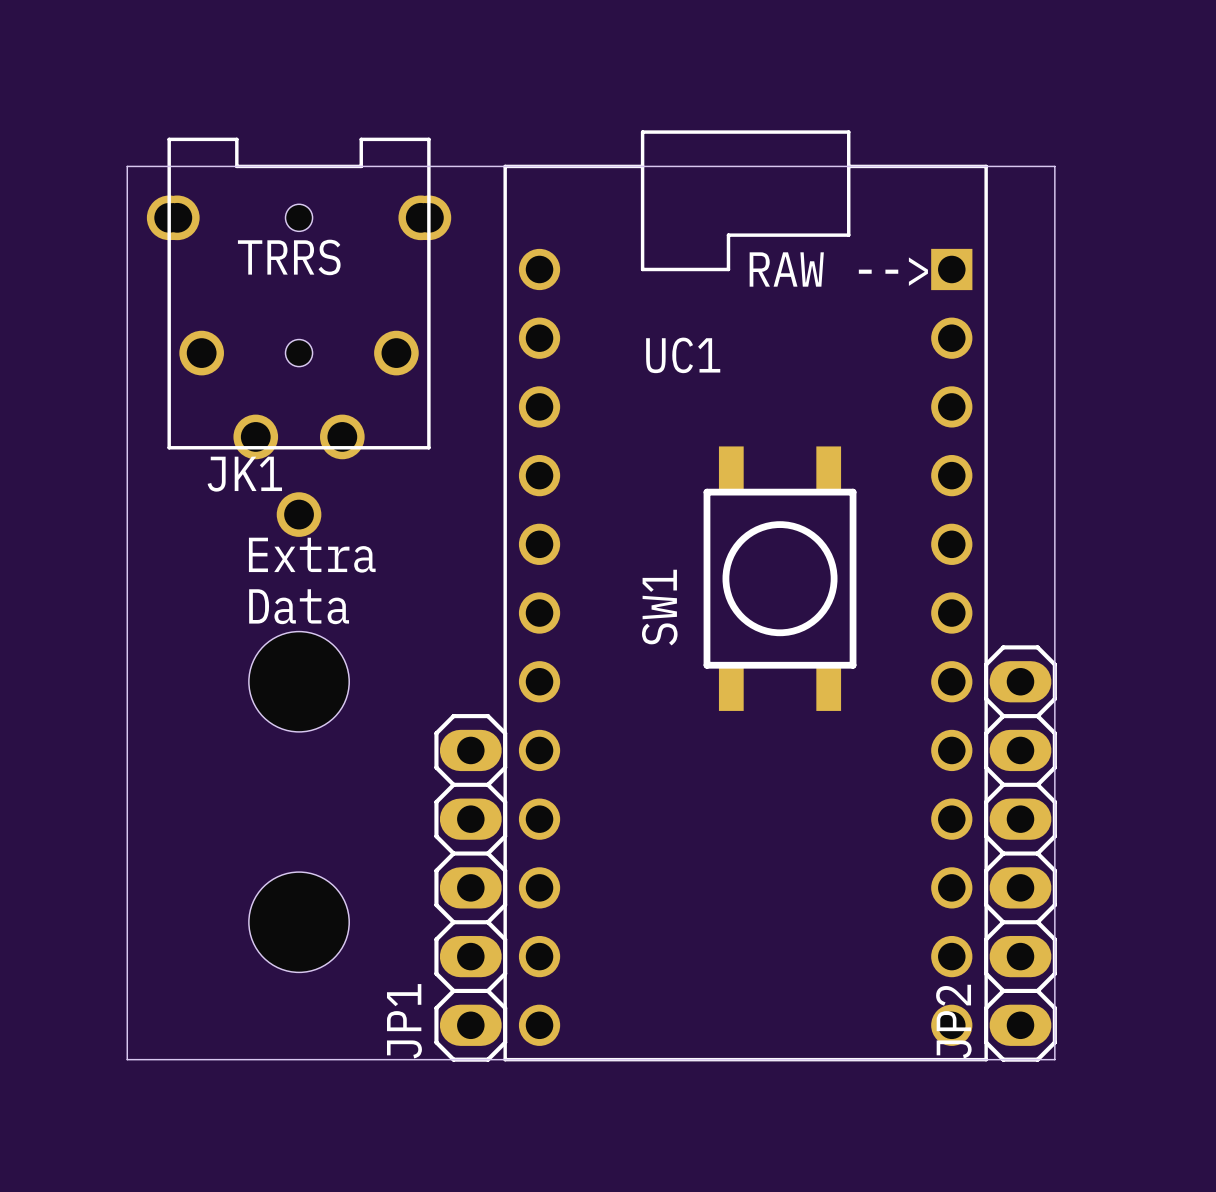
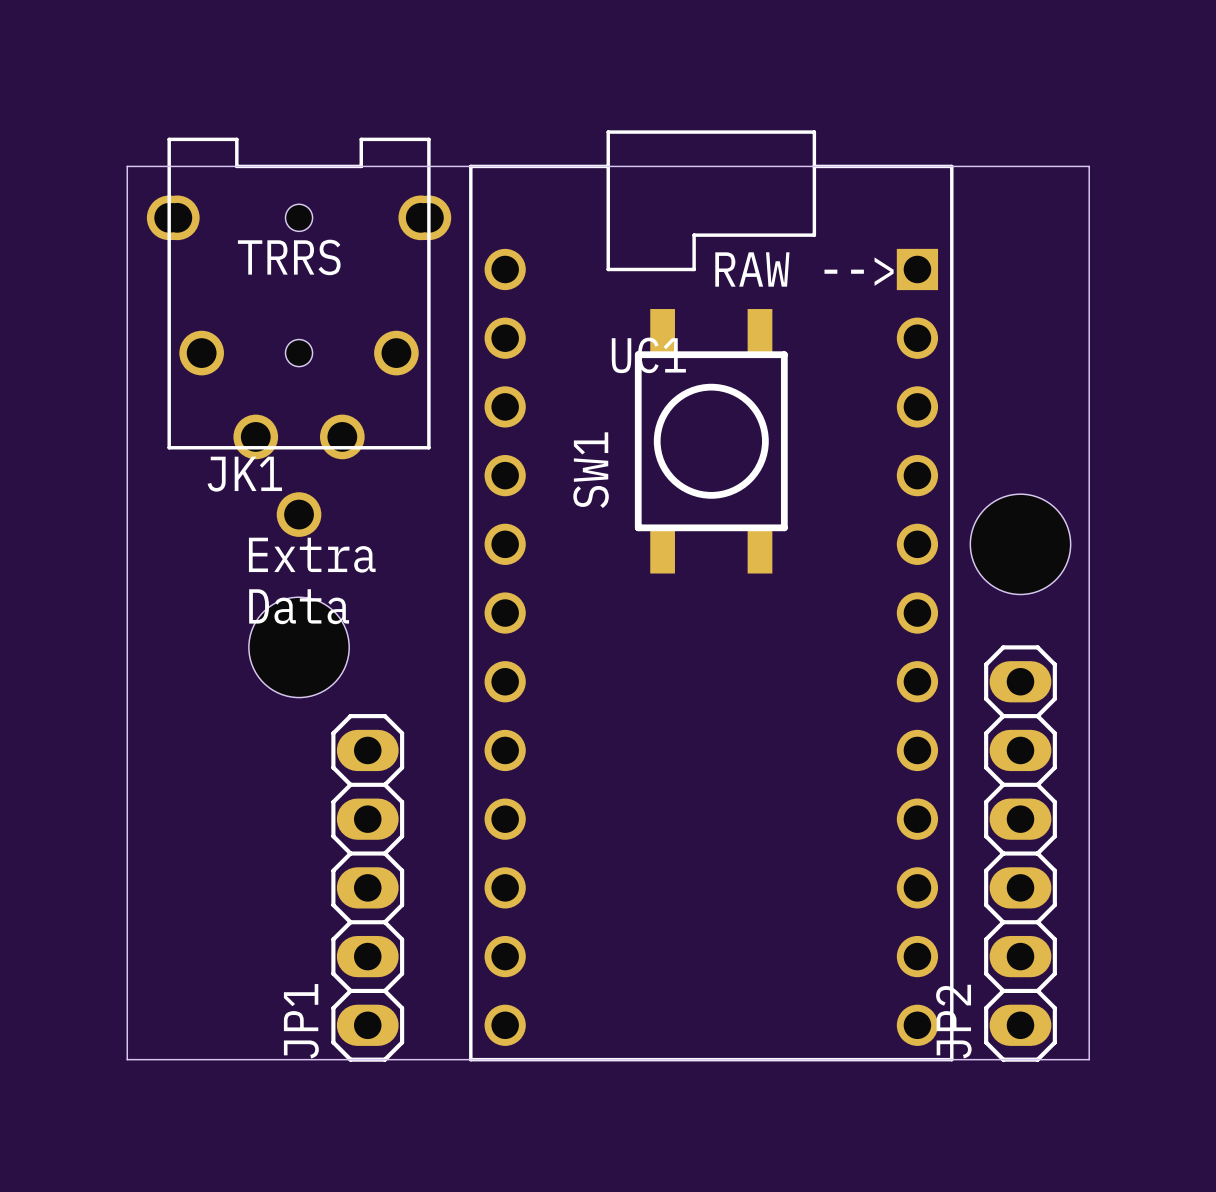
board edge: (1054, 166) (1054, 1059) -> (1054, 166) (1089, 166) (1089, 1059) (1054, 1059)
hole: none -> (1020, 544)
SW1 position: (780, 578) -> (711, 441)
UC1 position: (745, 595) -> (711, 595)
hole position: (299, 681) -> (299, 647)
JP1 position: (470, 887) -> (367, 887)
hole: (299, 922) -> none

